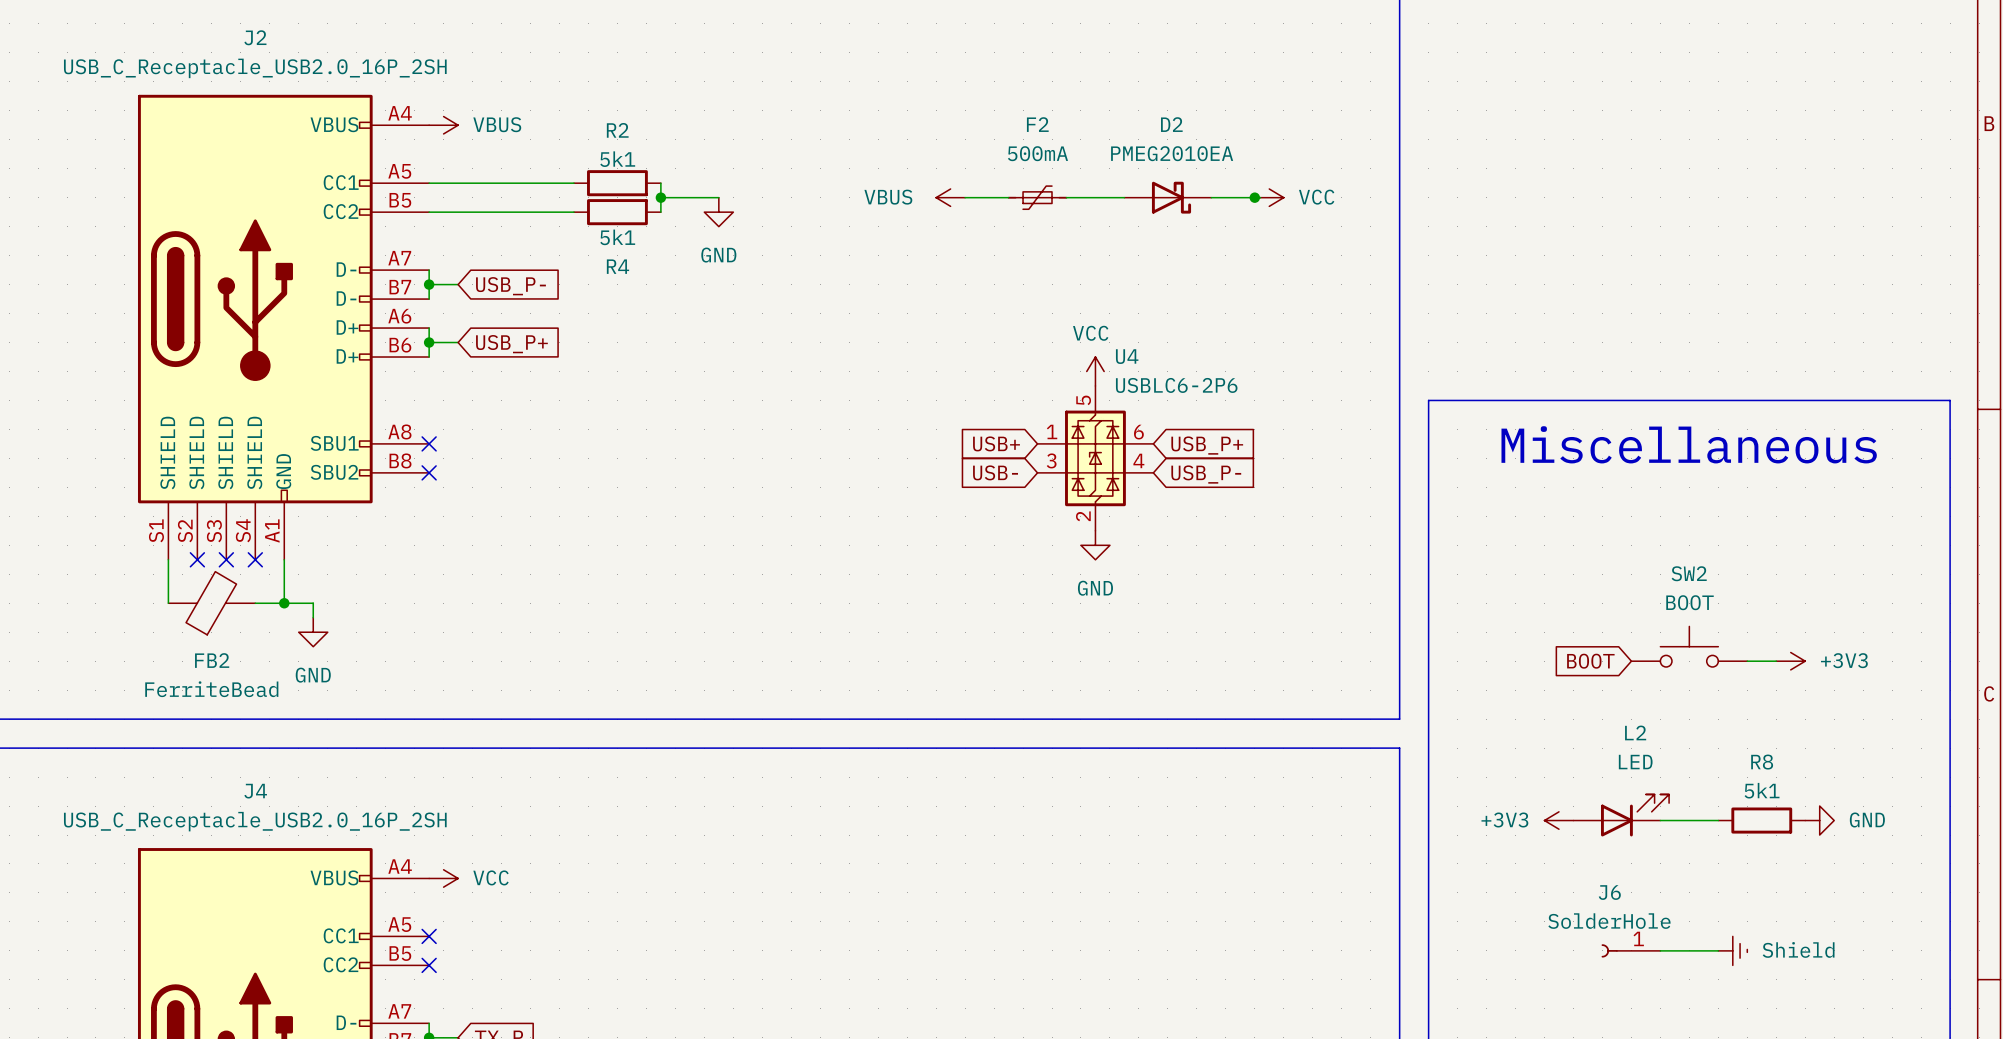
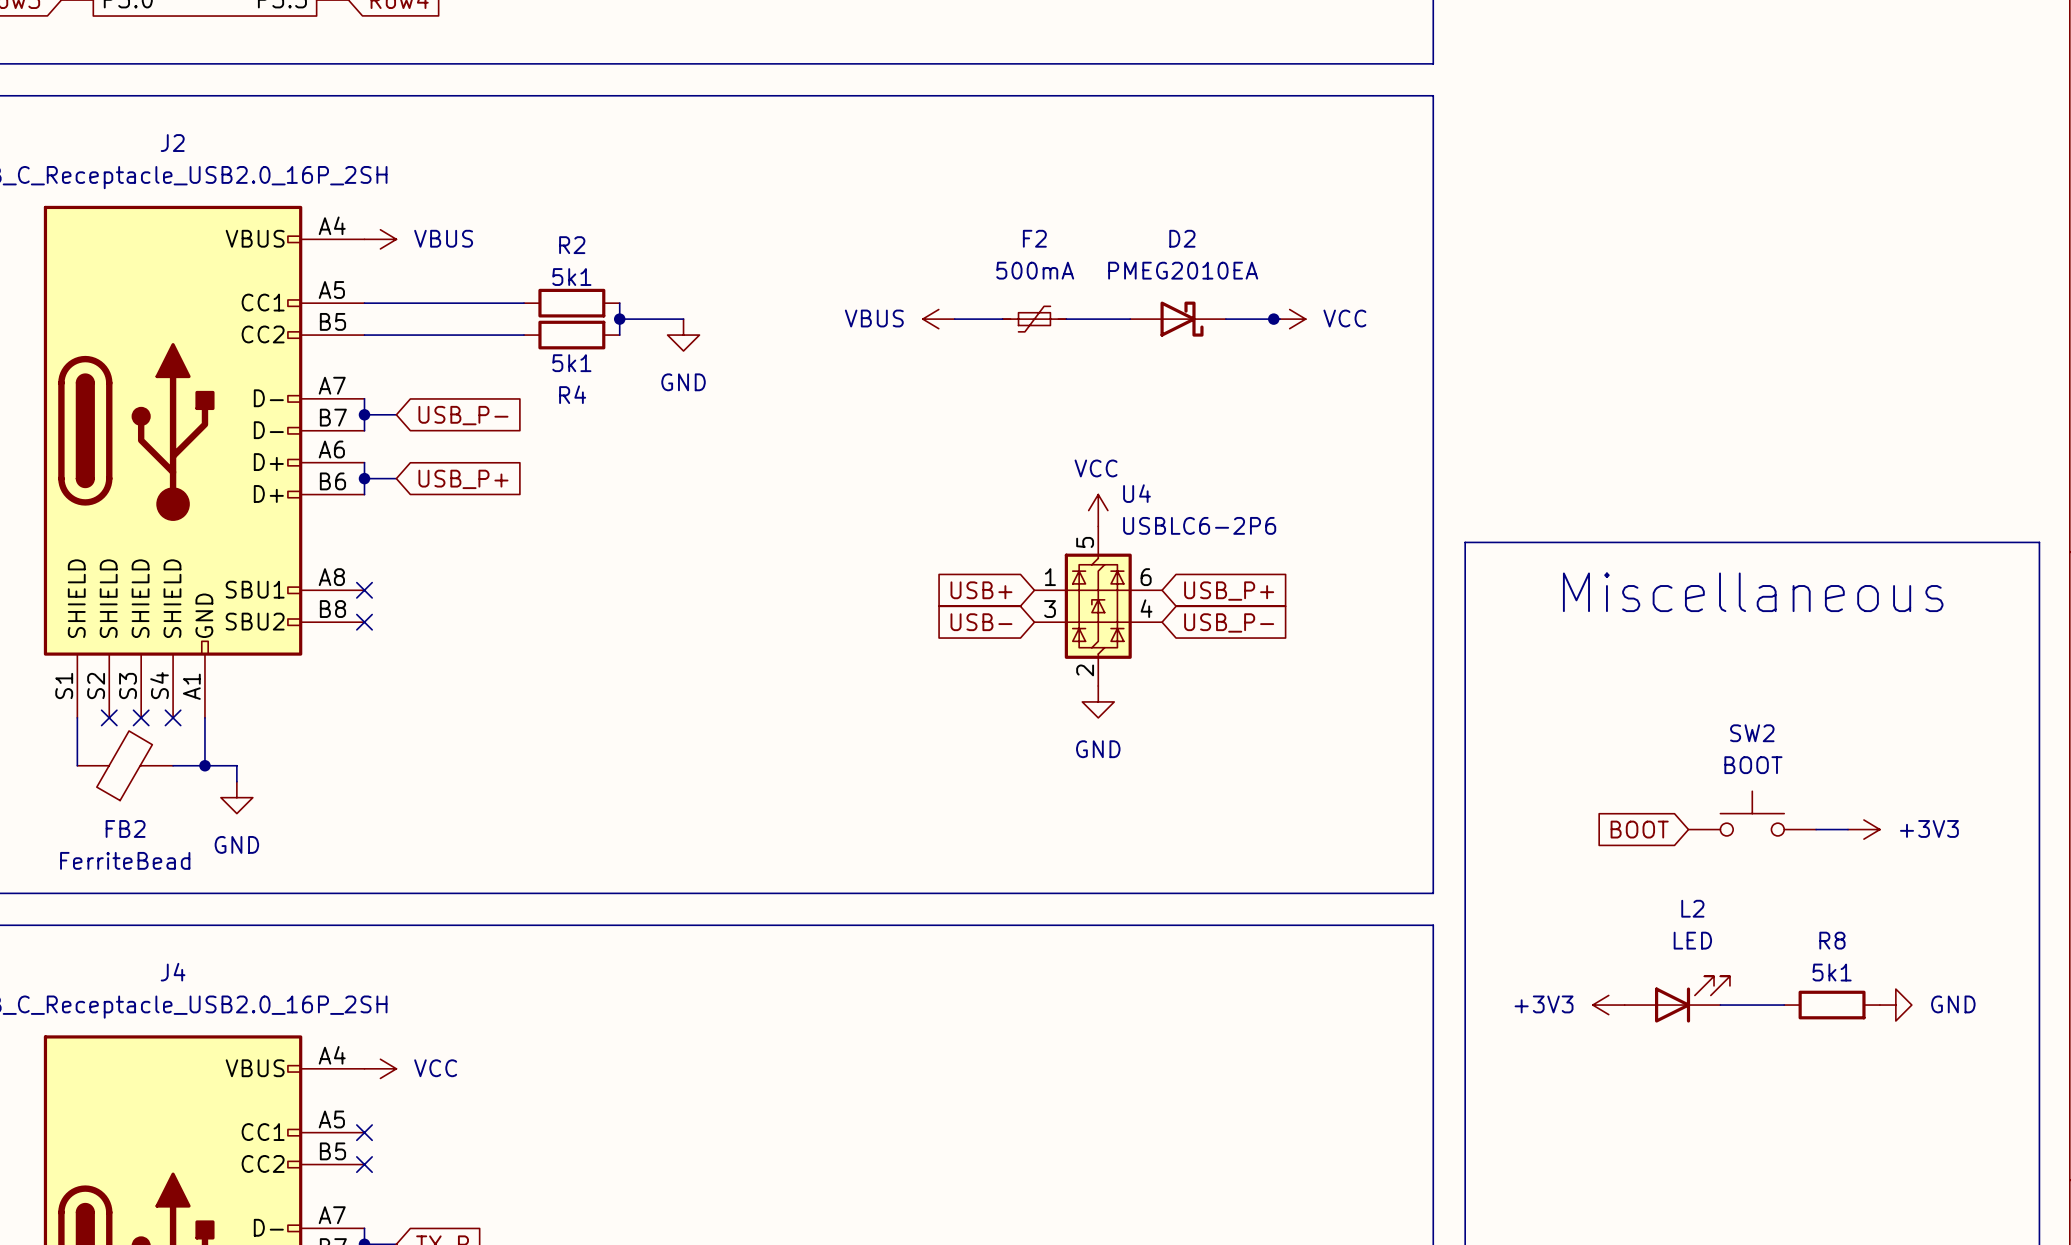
J6: SolderHole (1630, 950) -> none
wire: (1660, 950) (1718, 950) -> none
power symbol: Shield (1732, 950) -> none

